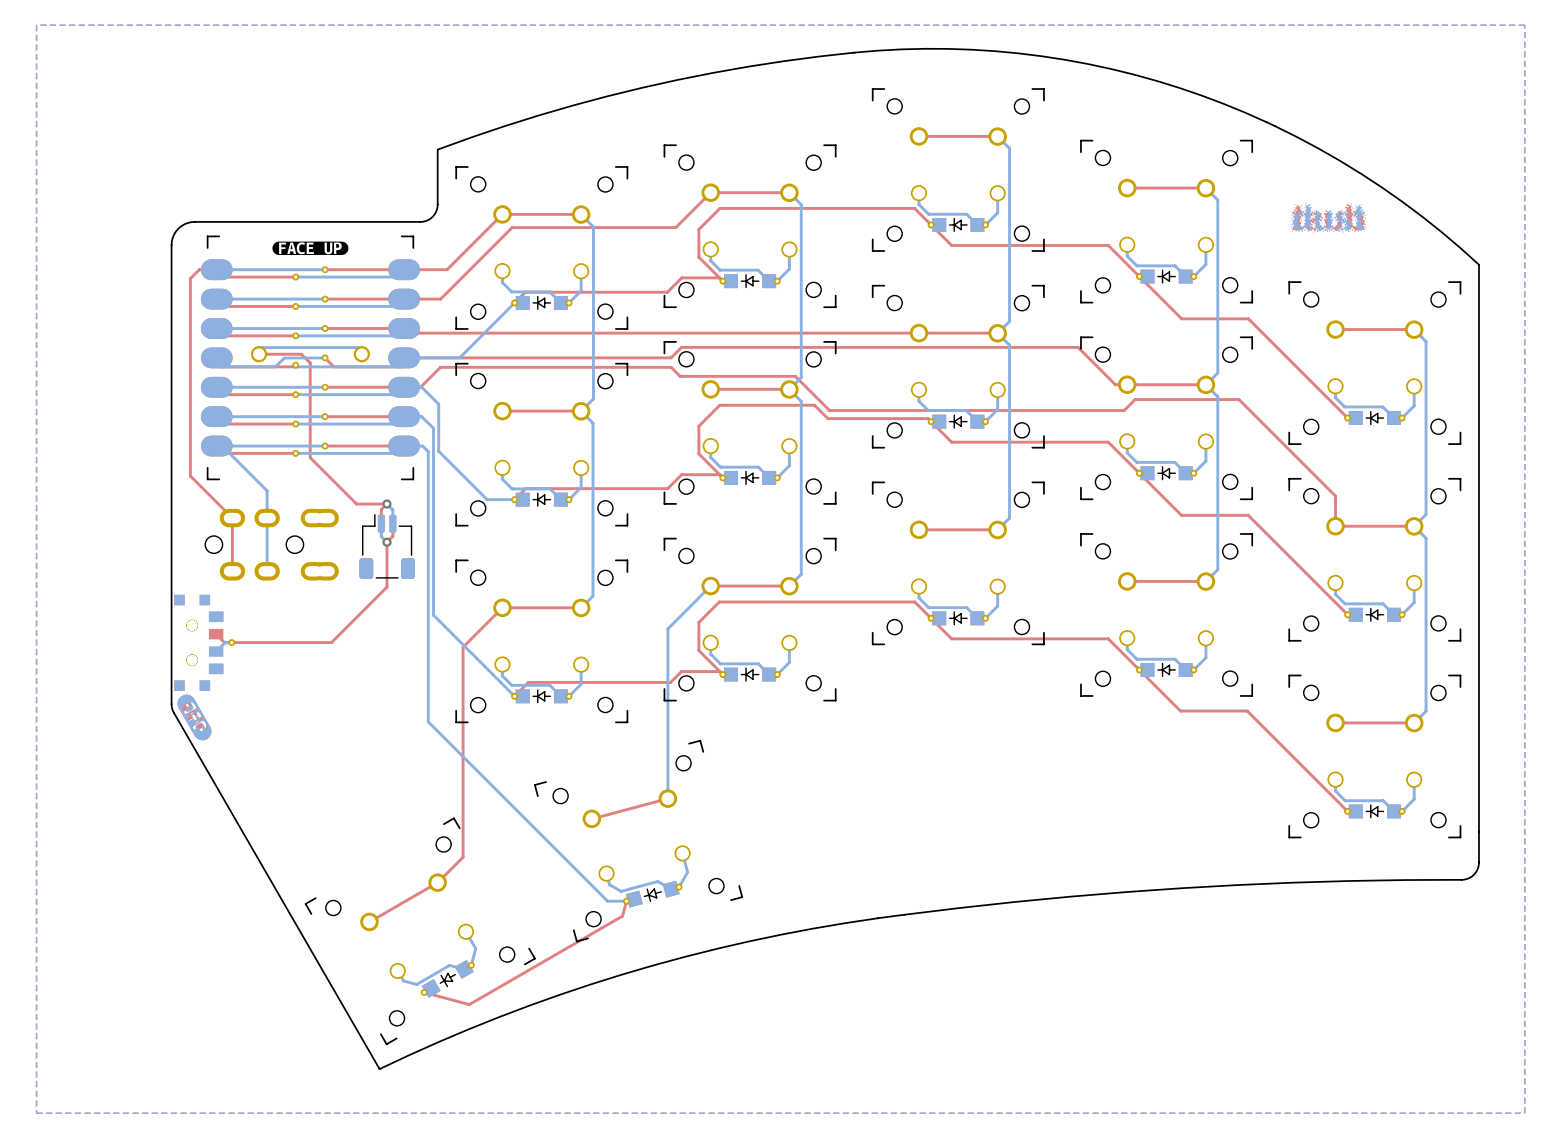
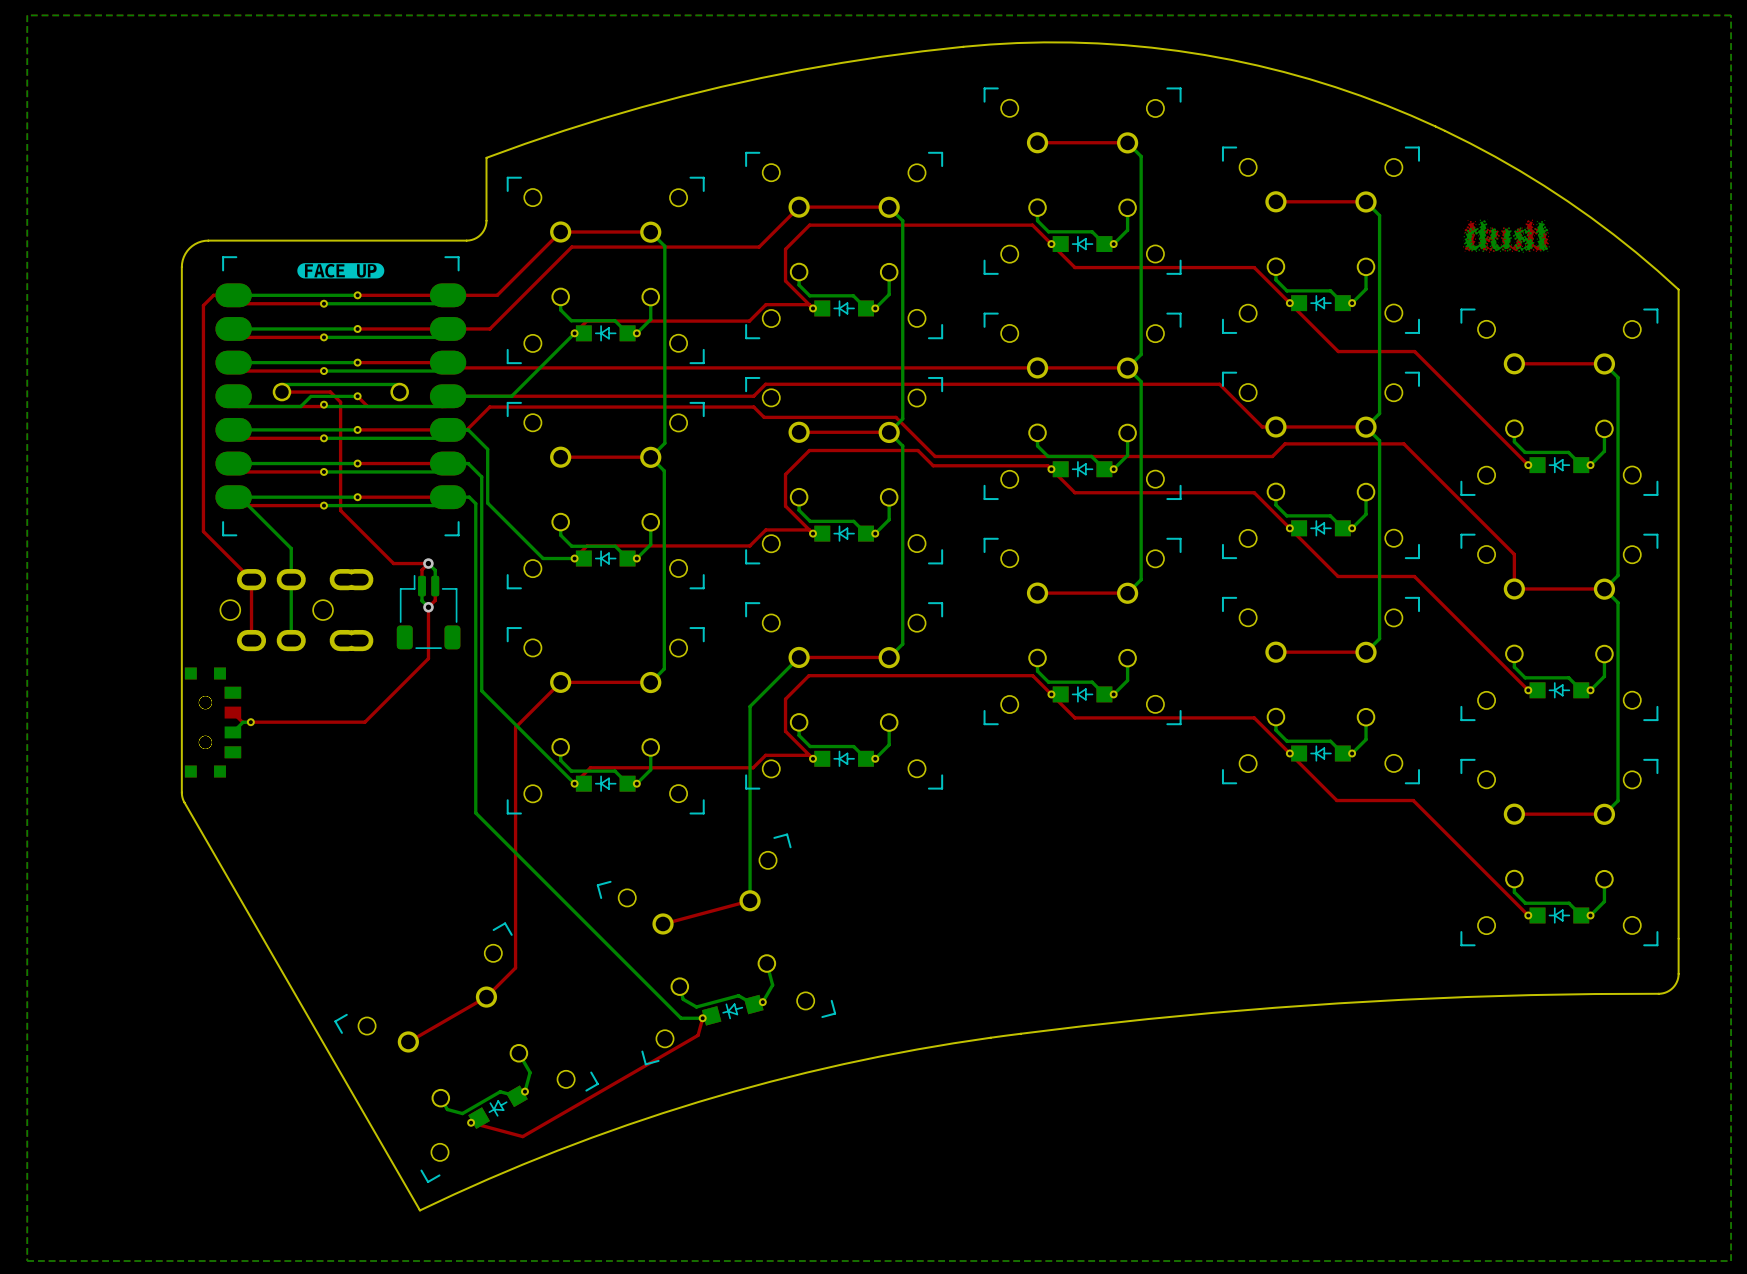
drawing: [177, 694, 212, 741] -> none

